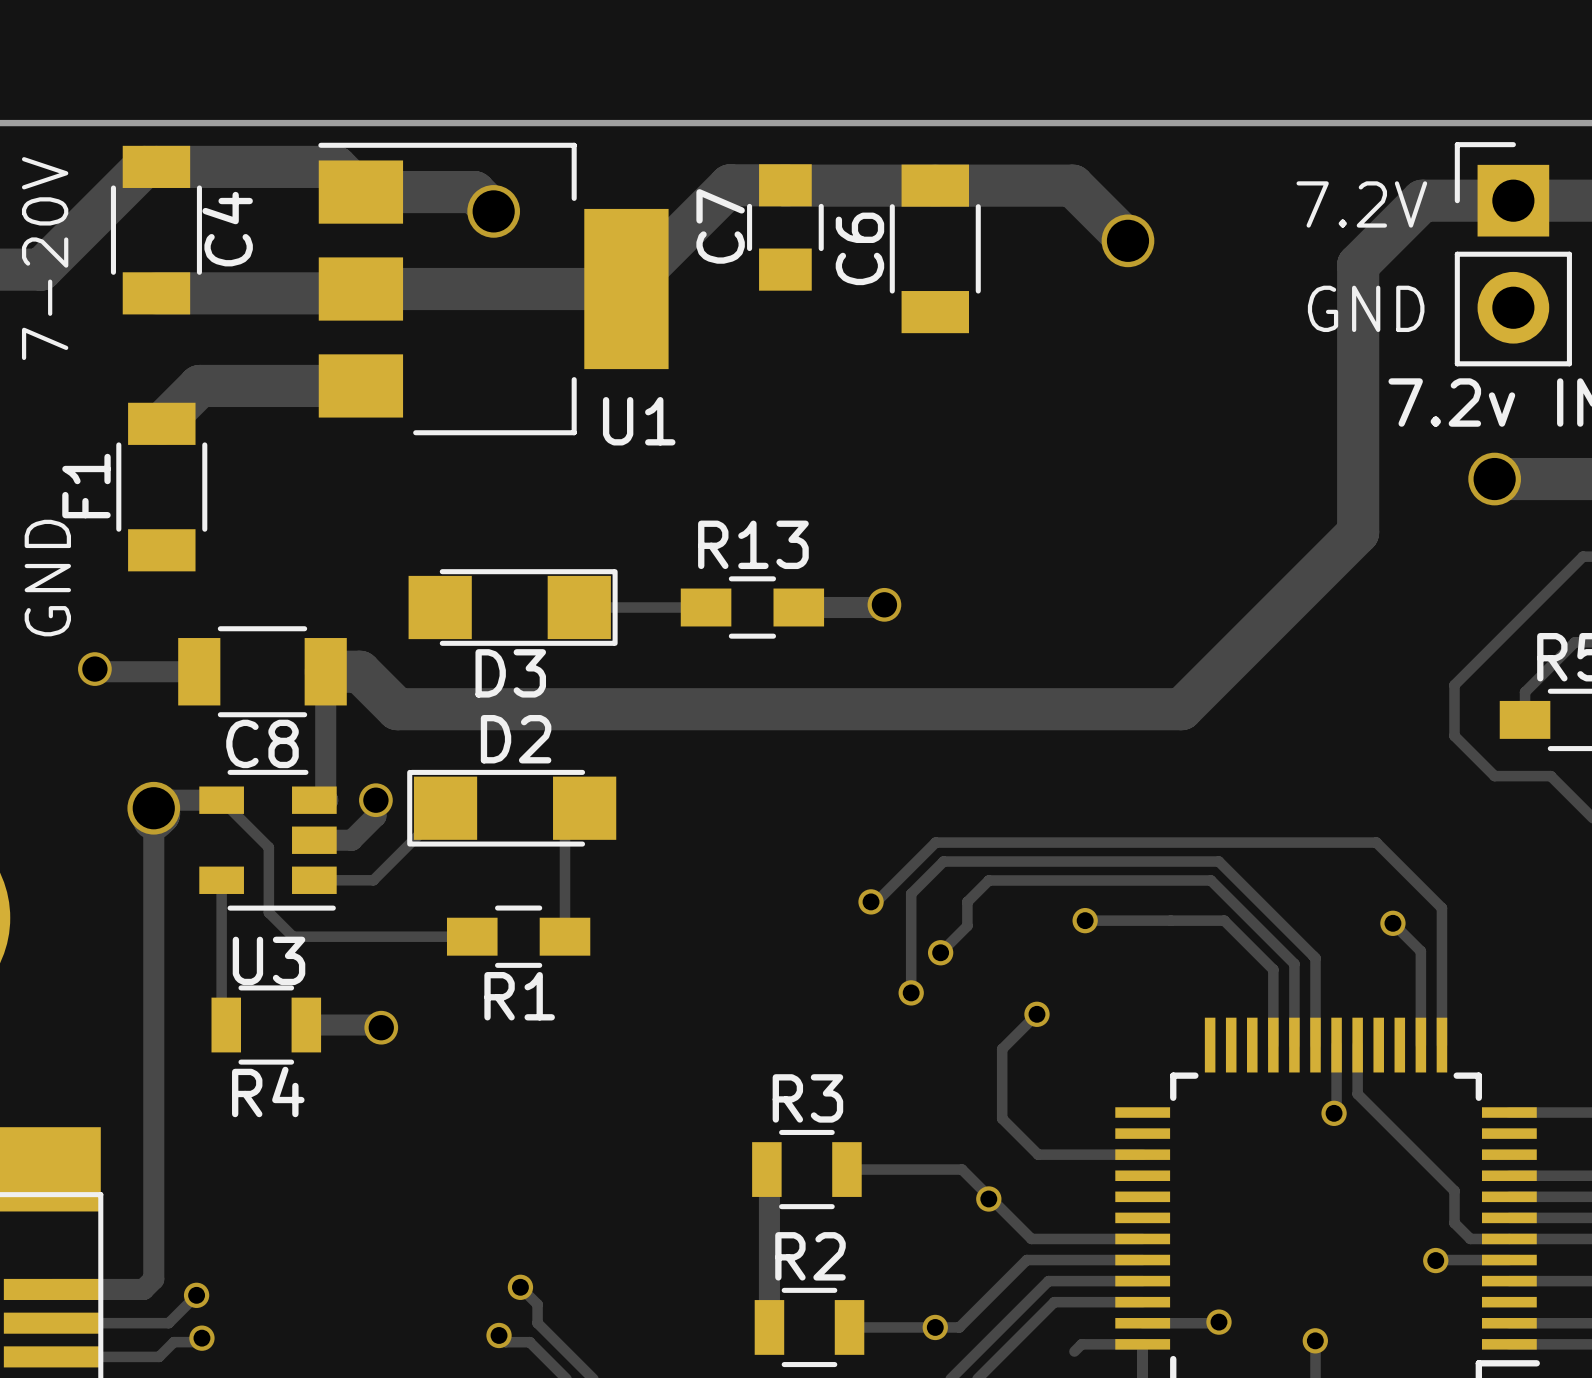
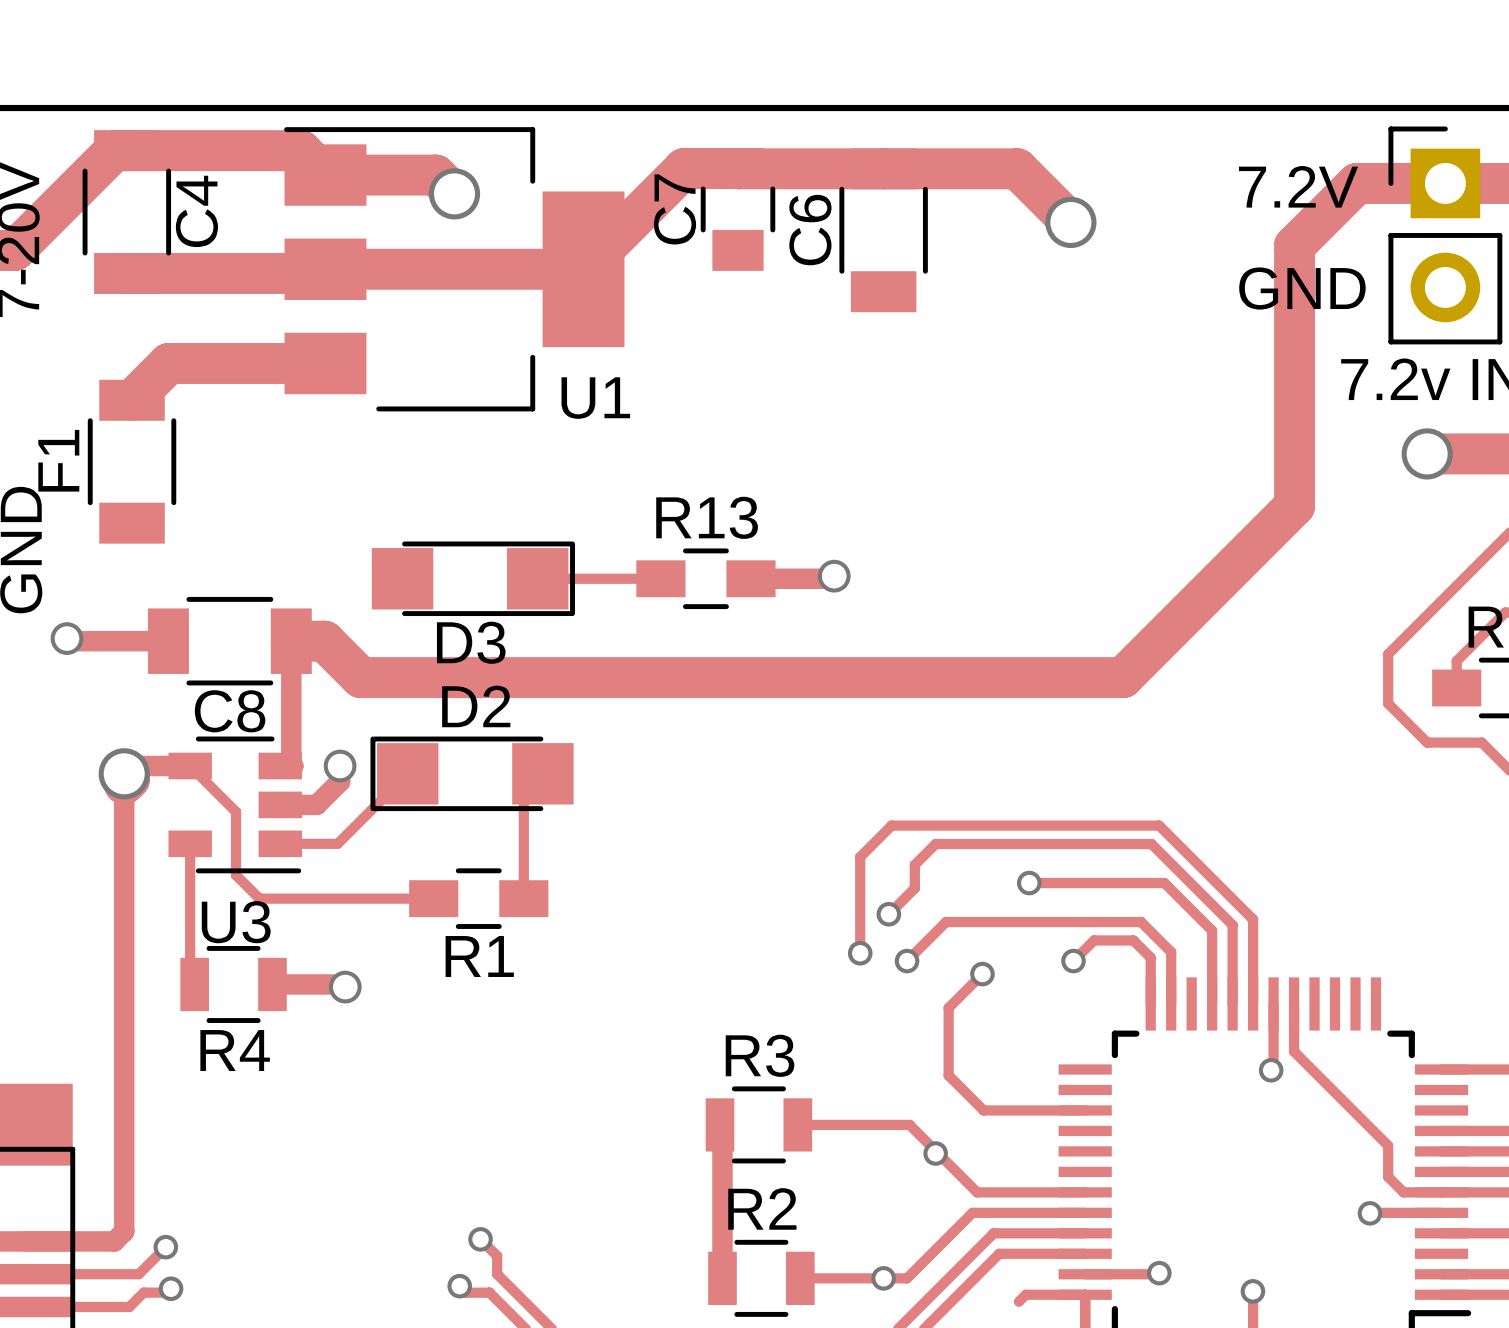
track: (871, 901) (876, 901) (935, 842) (1376, 842) (1441, 908) (1441, 1045) -> none
via position: (871, 901) -> (907, 961)
track: (1392, 923) (1420, 951) (1420, 1045) -> none
via: (1392, 923) -> none
track: none -> (907, 961) (946, 922) (1141, 922) (1171, 952) (1171, 1003)
track: none -> (1073, 961) (1094, 940) (1133, 940) (1150, 957) (1150, 1003)
via: none -> (1073, 961)

